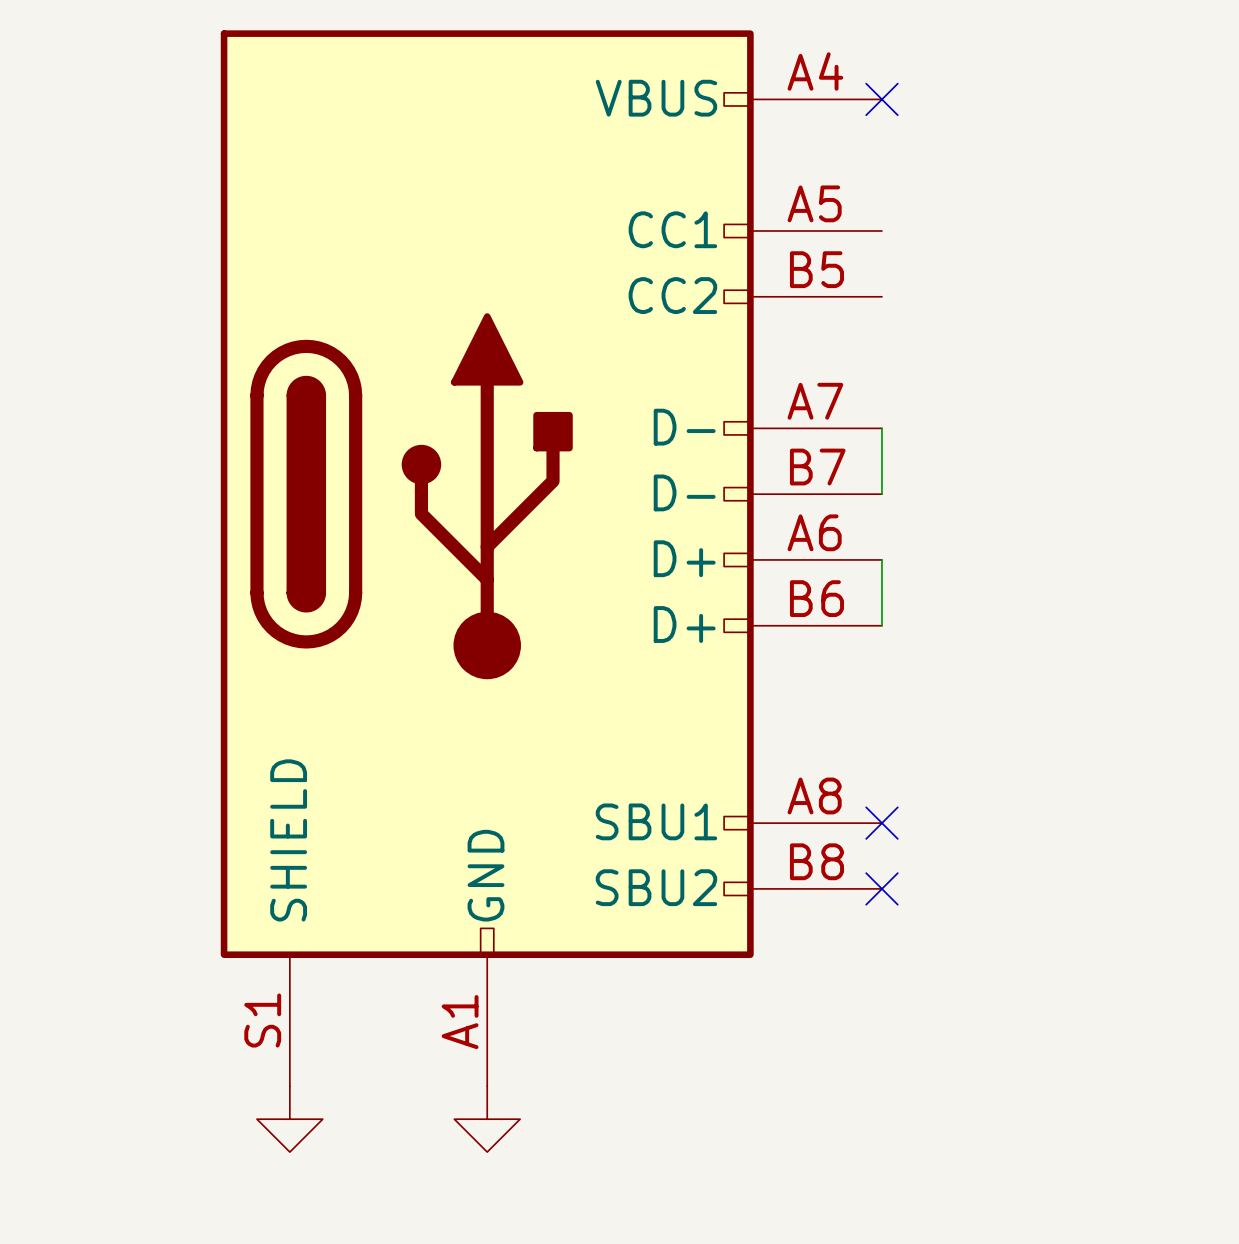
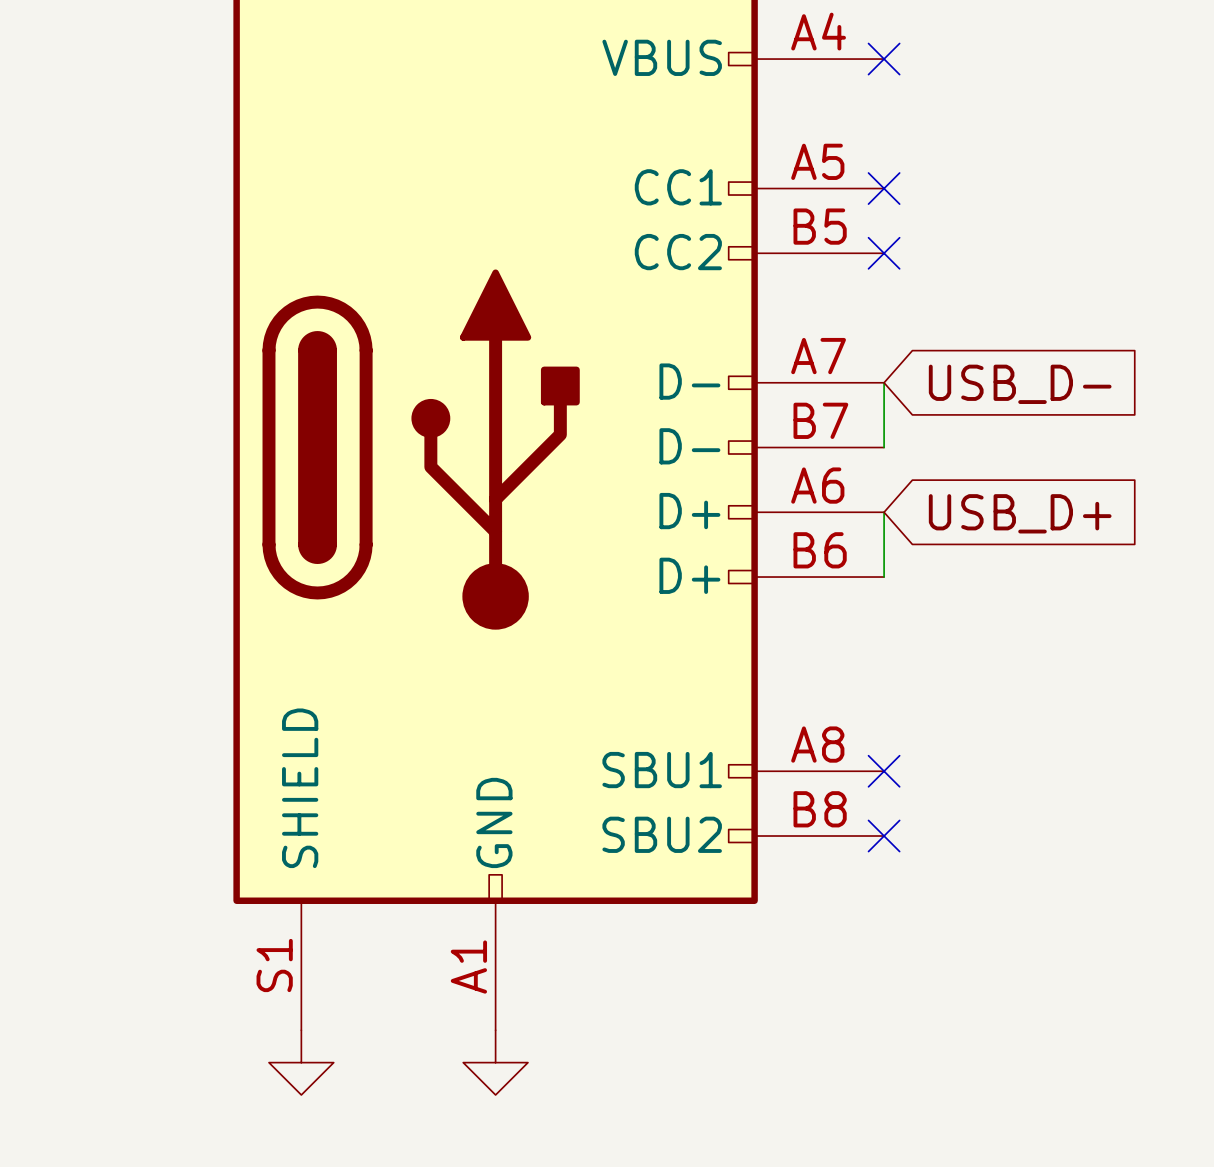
no-connect mark: none -> (884, 188)
no-connect mark: none -> (884, 253)
global label: none -> USB_D- (1020, 384)
global label: none -> USB_D+ (1020, 513)

